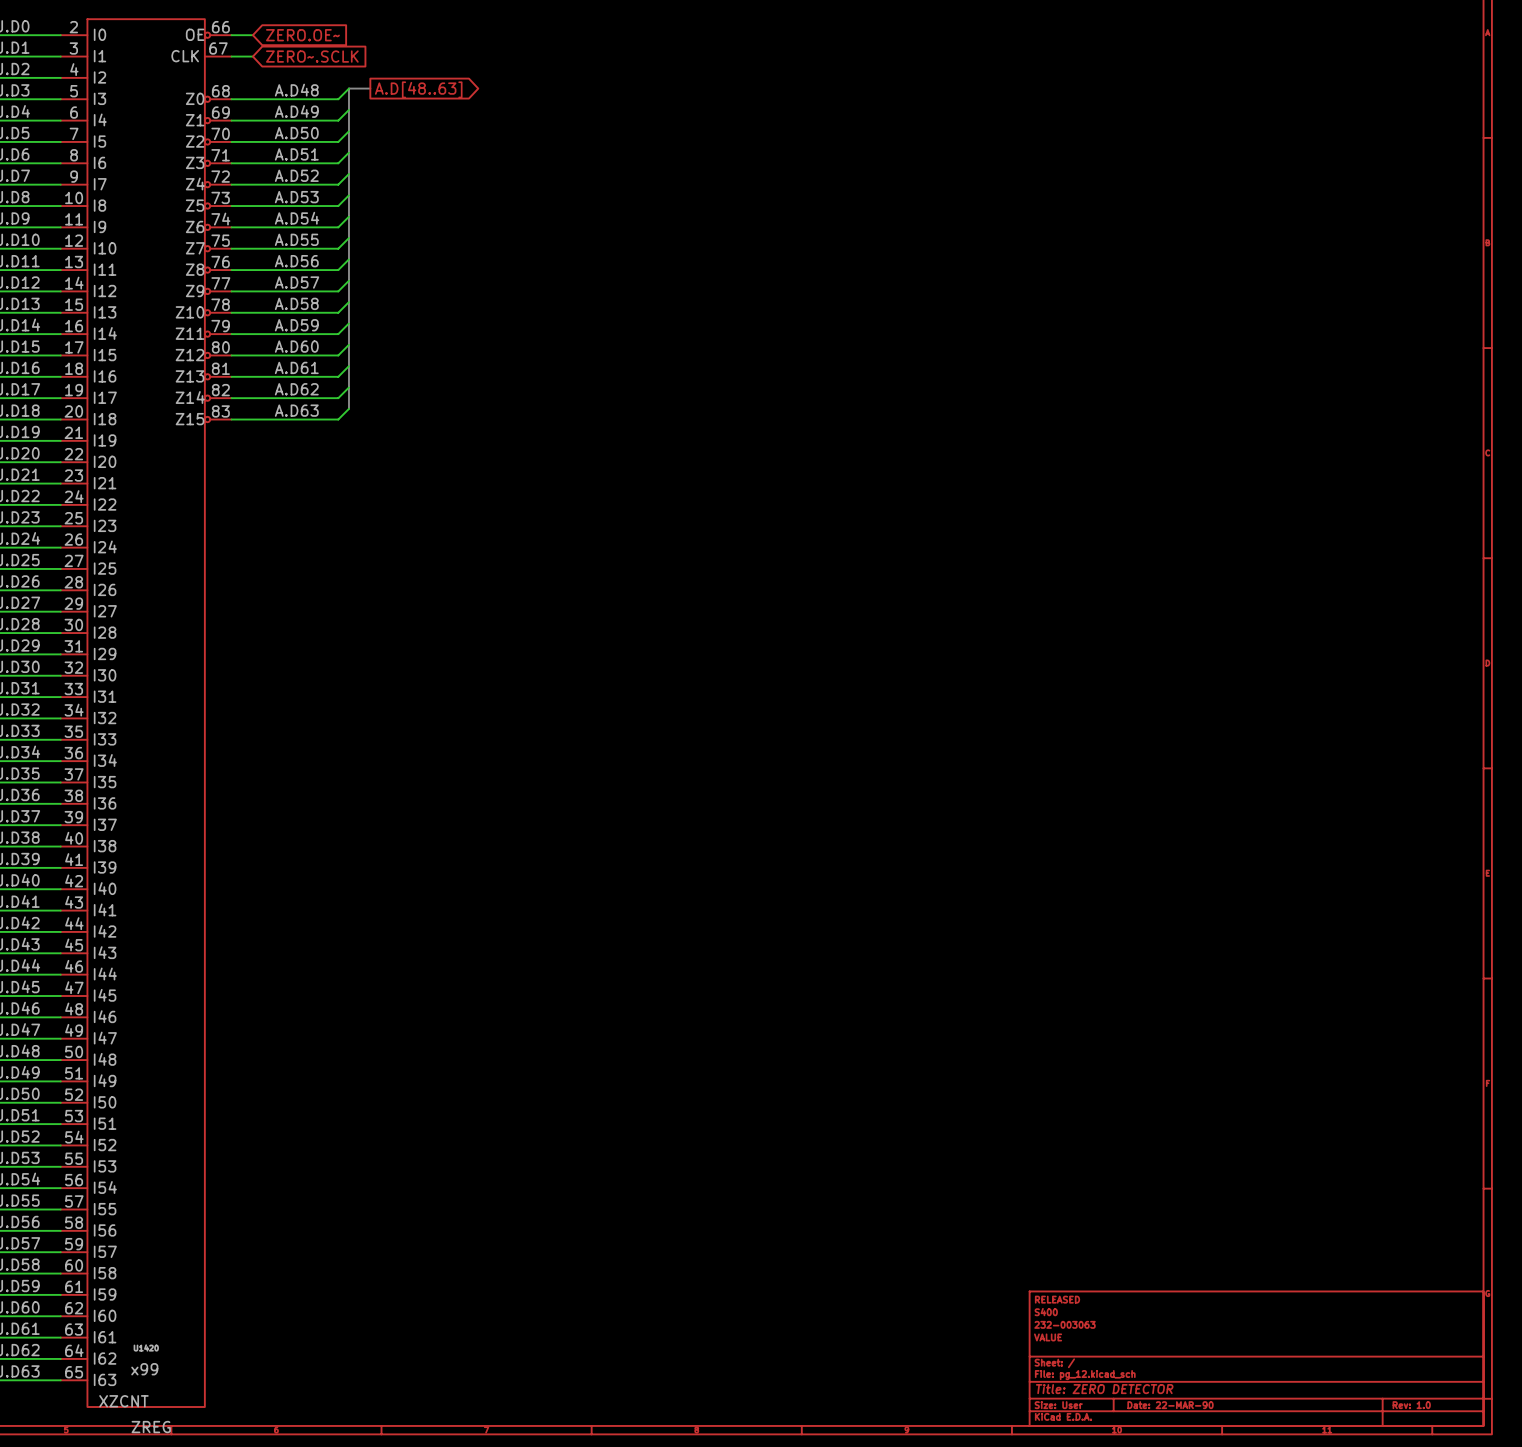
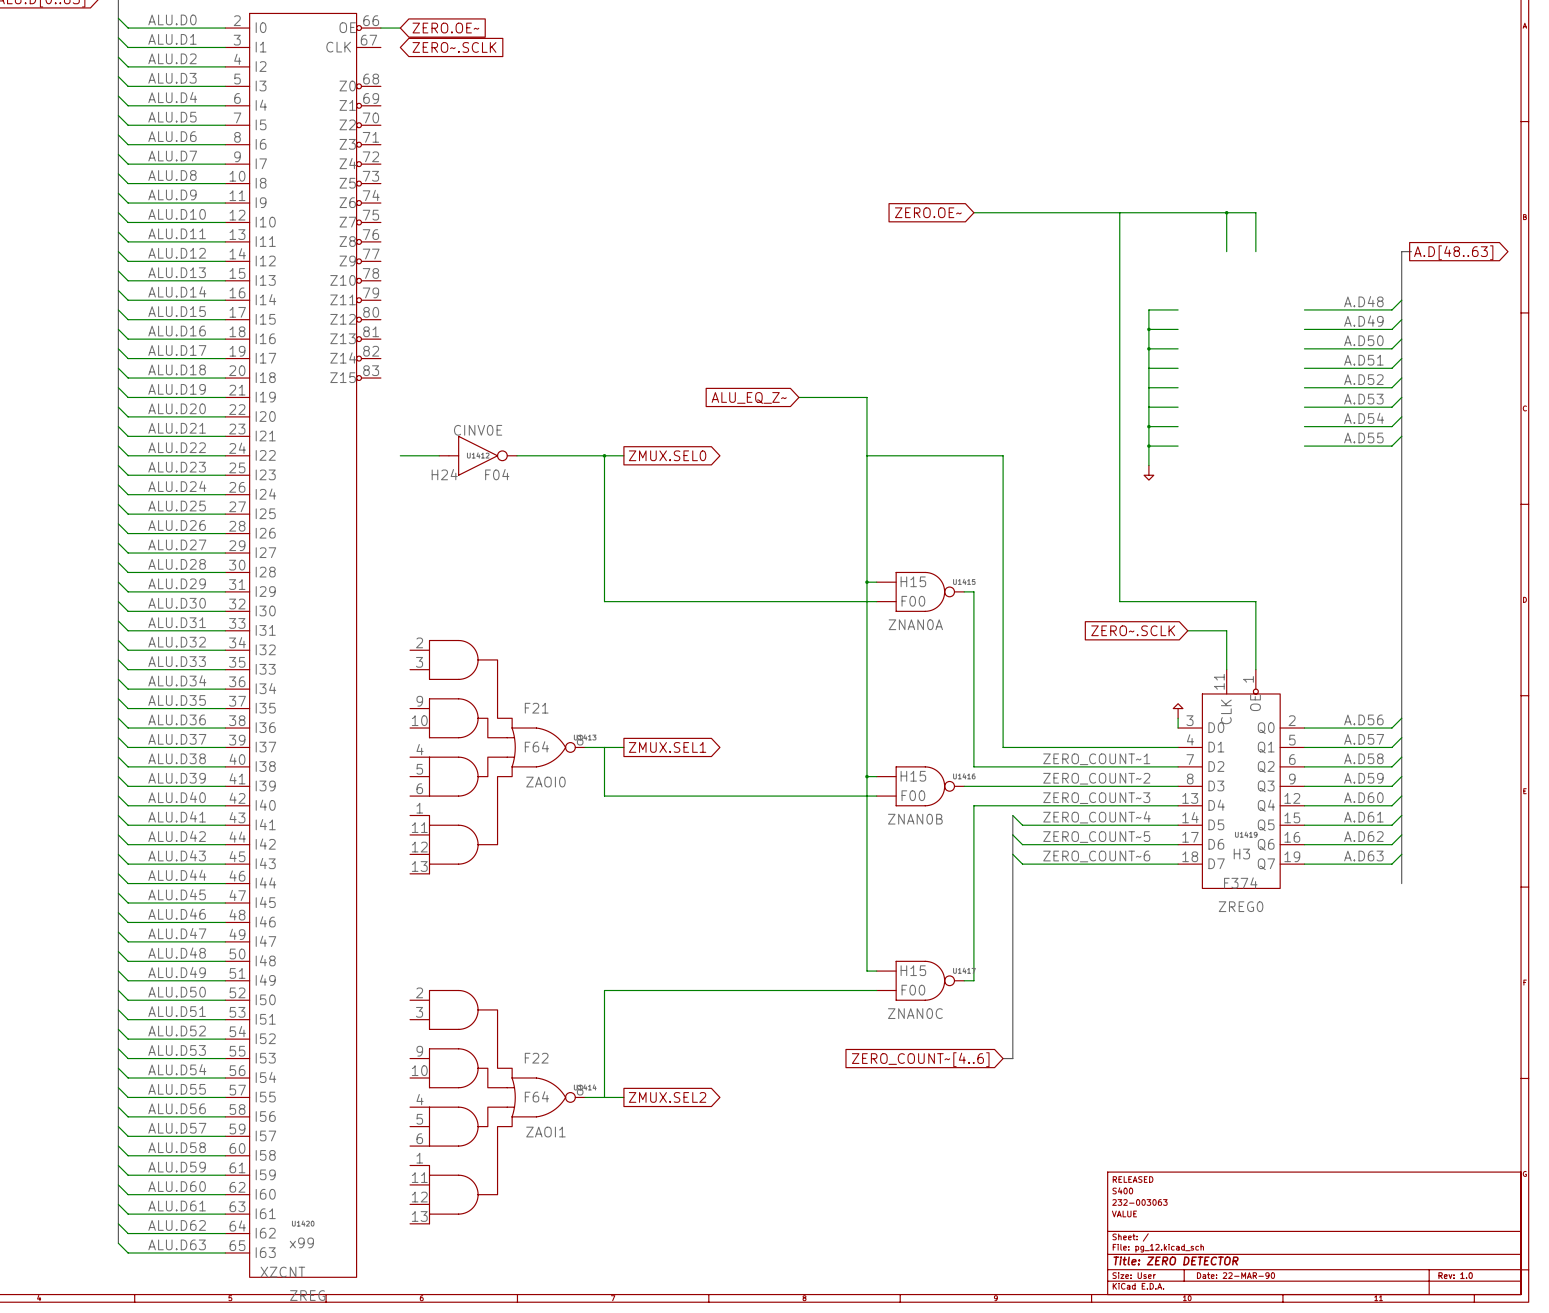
wire: (231, 56) (252, 56) -> none
wire: (348, 88) (338, 99) (231, 99) -> none
bus: (370, 88) (348, 88) (348, 408) -> none
global label: A.D[48..63] (418, 89) -> none
label: A.D48 (296, 90) -> none
wire: (348, 109) (338, 120) (231, 120) -> none
label: A.D49 (296, 111) -> none
wire: (348, 131) (338, 141) (231, 141) -> none
label: A.D50 (296, 133) -> none
wire: (348, 152) (338, 163) (231, 163) -> none
label: A.D51 (296, 154) -> none
wire: (348, 173) (338, 184) (231, 184) -> none
label: A.D52 (296, 175) -> none
wire: (348, 195) (338, 206) (231, 206) -> none
label: A.D53 (296, 197) -> none
wire: (348, 216) (338, 227) (231, 227) -> none
label: A.D54 (297, 218) -> none
wire: (348, 238) (338, 248) (231, 248) -> none
global label: none -> ZERO.OE~ (928, 212)
wire: none -> (973, 212) (1255, 212) (1255, 251)
wire: none -> (1119, 212) (1119, 601) (1255, 601) (1255, 669)
wire: none -> (1226, 212) (1226, 251)
junction: none -> (1226, 212)
label: A.D55 (296, 239) -> none
wire: (348, 259) (338, 270) (231, 270) -> none
label: A.D56 (296, 261) -> none
wire: (348, 280) (338, 291) (231, 291) -> none
bus: none -> (1411, 251) (1401, 251) (1401, 883)
label: A.D57 (297, 282) -> none
global label: none -> A.D[48..63] (1453, 252)
wire: (348, 302) (338, 312) (231, 312) -> none
label: A.D58 (296, 303) -> none
wire: (348, 323) (338, 334) (231, 334) -> none
label: A.D59 (296, 325) -> none
wire: none -> (1401, 300) (1391, 309) (1304, 309)
label: none -> A.D48 (1363, 301)
wire: (348, 344) (338, 355) (231, 355) -> none
wire: none -> (1178, 309) (1148, 309) (1148, 465)
label: A.D60 (296, 346) -> none
wire: none -> (1401, 319) (1391, 329) (1304, 329)
label: none -> A.D49 (1363, 321)
wire: (348, 366) (338, 376) (231, 376) -> none
wire: none -> (1148, 329) (1178, 329)
junction: none -> (1148, 329)
label: A.D61 (296, 367) -> none
wire: none -> (1401, 339) (1391, 348) (1304, 348)
label: none -> A.D50 (1363, 340)
wire: (348, 387) (338, 398) (231, 398) -> none
wire: none -> (1148, 348) (1178, 348)
junction: none -> (1148, 348)
label: A.D62 (296, 389) -> none
wire: none -> (1401, 358) (1391, 368) (1304, 368)
label: none -> A.D51 (1363, 360)
wire: (348, 408) (338, 419) (231, 419) -> none
wire: none -> (1148, 368) (1178, 368)
label: A.D63 (296, 410) -> none
wire: none -> (1401, 378) (1391, 387) (1304, 387)
label: none -> A.D52 (1363, 379)
wire: none -> (1148, 387) (1178, 387)
wire: none -> (798, 397) (866, 397) (866, 971) (876, 971)
wire: none -> (1401, 397) (1391, 407) (1304, 407)
global label: none -> ALU_EQ_Z~ (749, 397)
label: none -> A.D53 (1363, 399)
wire: none -> (1148, 407) (1178, 407)
wire: none -> (1401, 416) (1391, 426) (1304, 426)
label: none -> A.D54 (1364, 418)
wire: none -> (1148, 426) (1178, 426)
junction: none -> (1148, 426)
wire: none -> (1401, 436) (1391, 446) (1304, 446)
label: none -> A.D55 (1363, 437)
wire: none -> (1148, 446) (1178, 446)
junction: none -> (1148, 446)
wire: none -> (400, 455) (439, 455)
part: none -> F04 (478, 455)
wire: none -> (516, 455) (623, 455)
wire: none -> (604, 455) (604, 601) (876, 601)
junction: none -> (604, 455)
global label: none -> ZMUX.SEL0 (667, 455)
wire: none -> (866, 455) (1003, 455) (1003, 747) (1178, 747)
power symbol: none -> (1148, 472)
wire: none -> (866, 582) (876, 582)
junction: none -> (866, 582)
part: none -> F00 (920, 591)
wire: none -> (964, 591) (973, 591) (973, 766) (1178, 766)
global label: none -> ZERO~.SCLK (1133, 630)
wire: none -> (1187, 630) (1226, 630) (1226, 669)
power symbol: none -> (1178, 710)
wire: none -> (1178, 718) (1178, 728)
wire: none -> (1401, 718) (1391, 728) (1304, 728)
label: none -> A.D56 (1363, 719)
wire: none -> (1401, 737) (1391, 747) (1304, 747)
label: none -> A.D57 (1364, 739)
wire: none -> (585, 747) (623, 747)
wire: none -> (604, 747) (604, 796) (876, 796)
global label: none -> ZMUX.SEL1 (667, 747)
part: none -> F64 (497, 757)
wire: none -> (1401, 757) (1391, 766) (1304, 766)
label: none -> A.D58 (1363, 758)
label: none -> ZERO_COUNT~1 (1096, 759)
wire: none -> (866, 776) (876, 776)
junction: none -> (866, 776)
wire: none -> (1401, 776) (1391, 786) (1304, 786)
label: none -> ZERO_COUNT~2 (1096, 778)
part: none -> F374 (1241, 779)
label: none -> A.D59 (1363, 778)
part: none -> F00 (920, 786)
wire: none -> (964, 786) (1178, 786)
wire: none -> (1401, 796) (1391, 805) (1304, 805)
label: none -> ZERO_COUNT~3 (1096, 798)
label: none -> A.D60 (1363, 797)
wire: none -> (1178, 805) (973, 805) (973, 980) (964, 980)
bus: none -> (1012, 815) (1012, 1058) (1003, 1058)
wire: none -> (1012, 815) (1022, 825) (1178, 825)
wire: none -> (1401, 815) (1391, 825) (1304, 825)
label: none -> ZERO_COUNT~4 (1096, 817)
label: none -> A.D61 (1363, 817)
wire: none -> (1012, 834) (1022, 844) (1178, 844)
wire: none -> (1401, 834) (1391, 844) (1304, 844)
label: none -> ZERO_COUNT~5 (1096, 837)
label: none -> A.D62 (1363, 836)
wire: none -> (1012, 854) (1022, 864) (1178, 864)
wire: none -> (1401, 854) (1391, 864) (1304, 864)
label: none -> ZERO_COUNT~6 (1096, 856)
label: none -> A.D63 (1363, 856)
part: none -> F00 (920, 980)
wire: none -> (876, 990) (604, 990) (604, 1097)
global label: none -> ZERO_COUNT~[4..6] (920, 1059)
wire: none -> (585, 1097) (623, 1097)
global label: none -> ZMUX.SEL2 (667, 1097)
part: none -> F64 (497, 1107)

